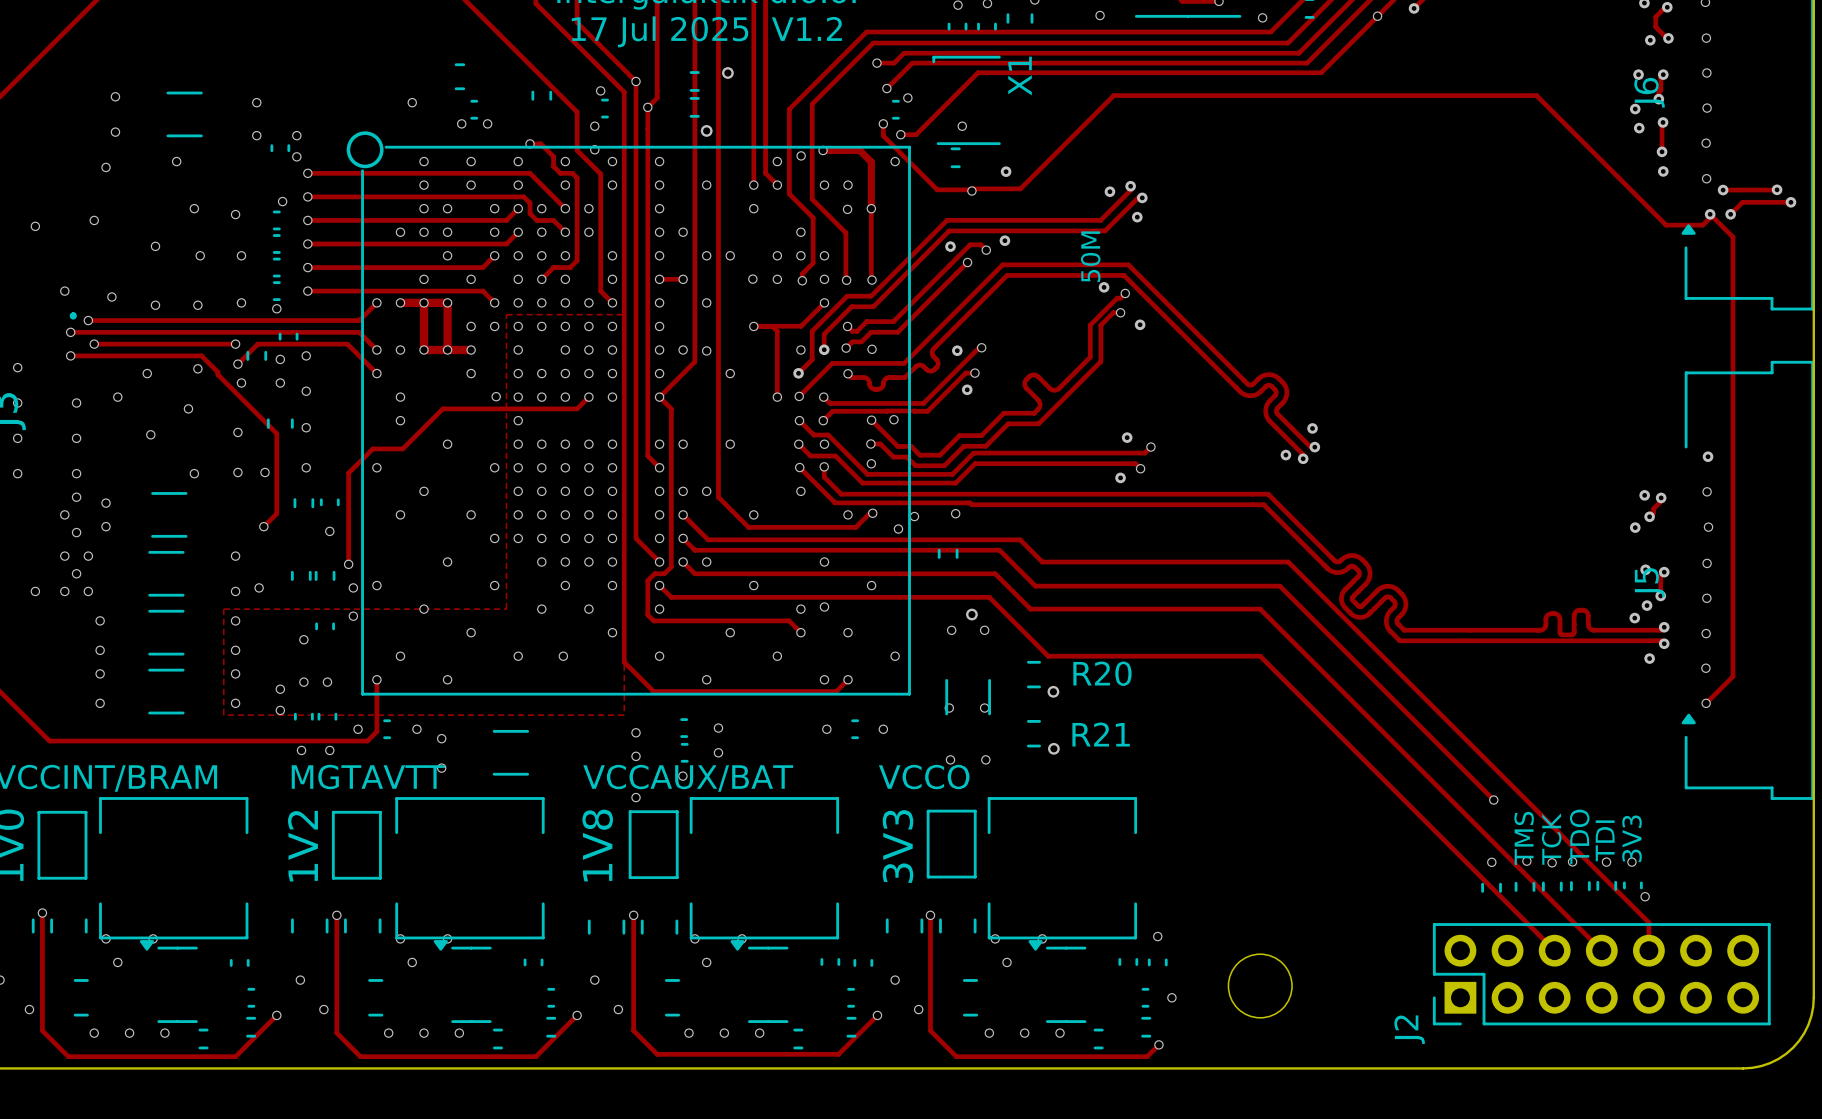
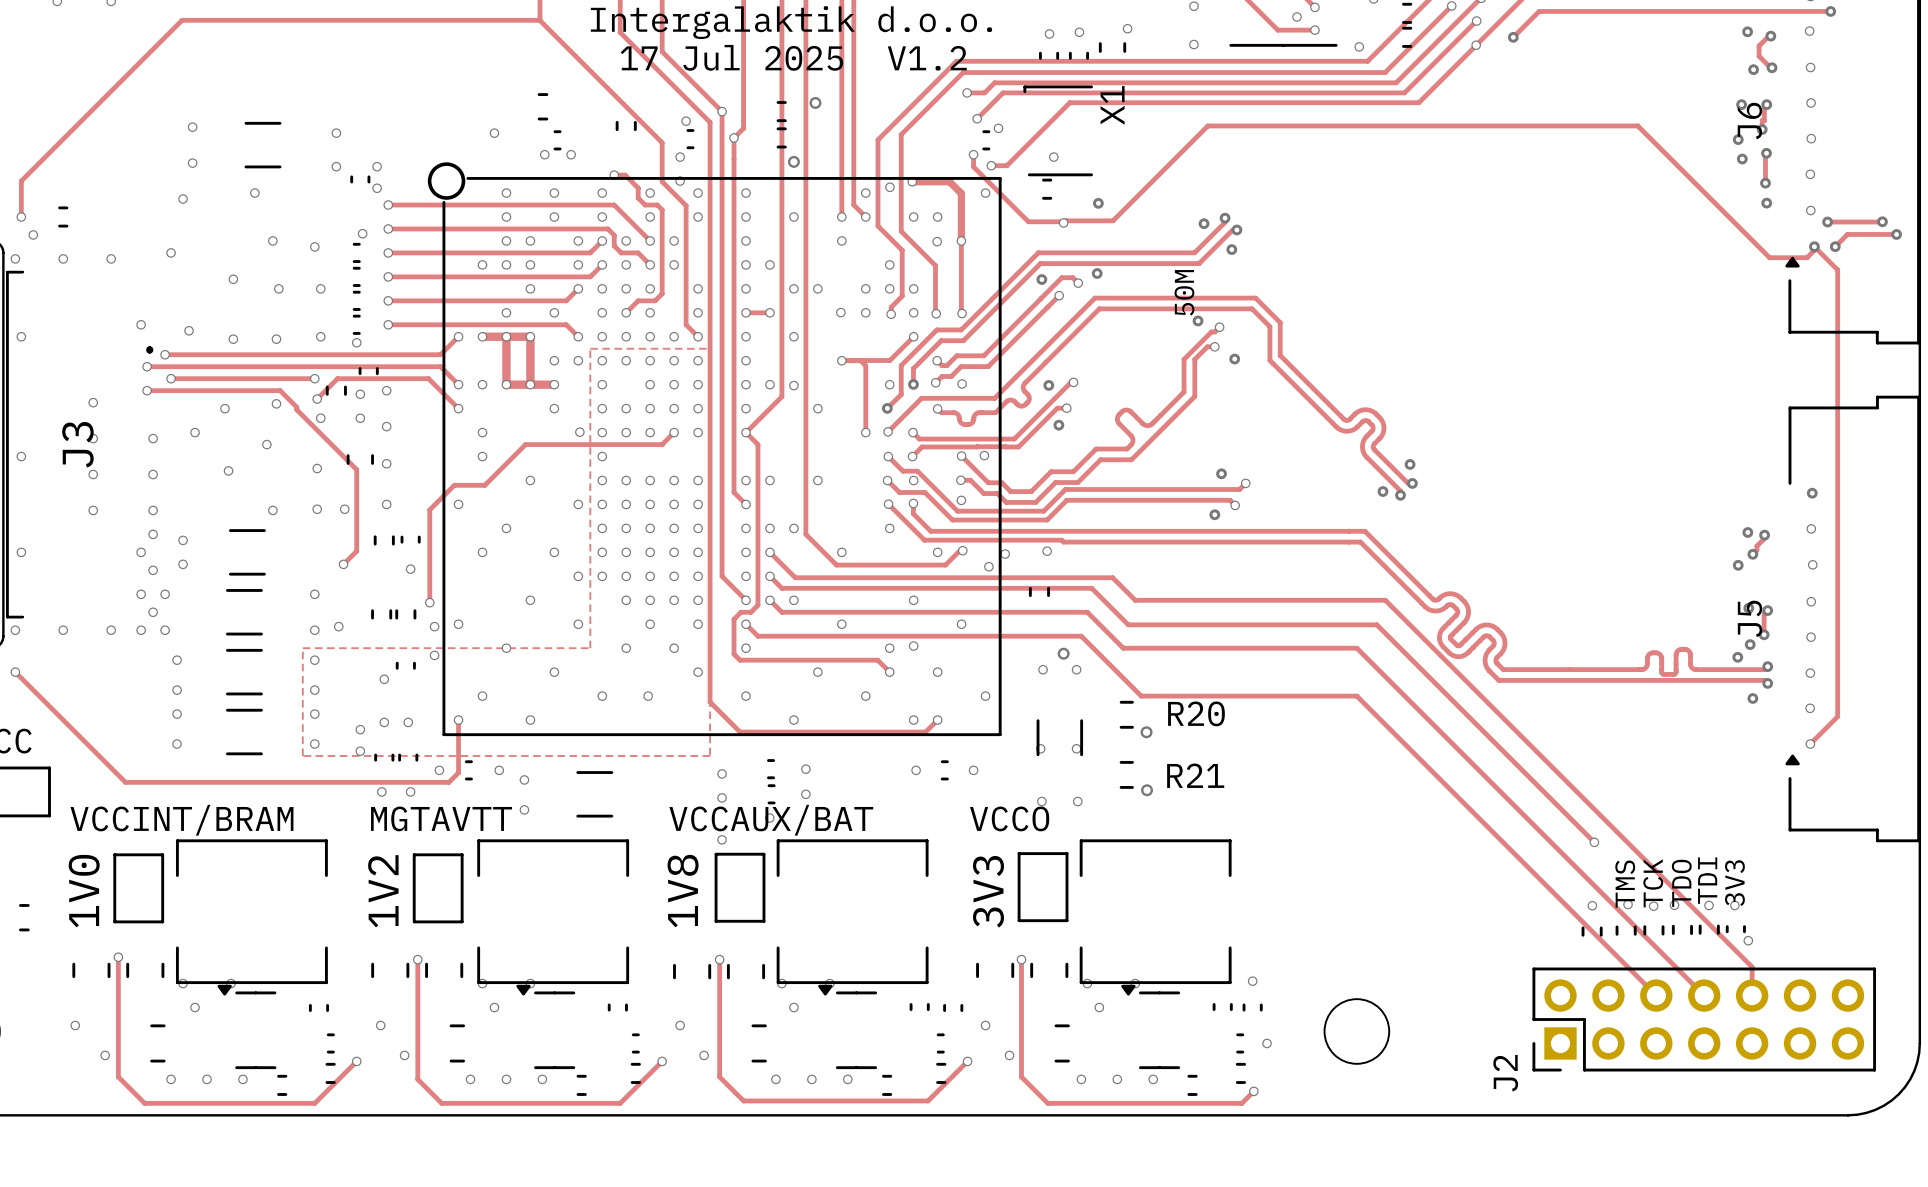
track: (1128, 264) (1184, 321) -> (1222, 298) (1255, 298) (1280, 322) (1280, 355)
track: (1124, 275) (1174, 326) -> (1218, 308) (1252, 308) (1269, 326) (1269, 360)

